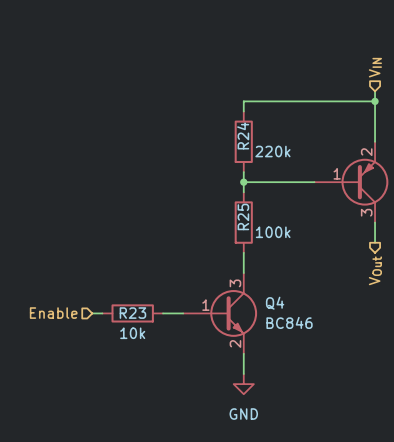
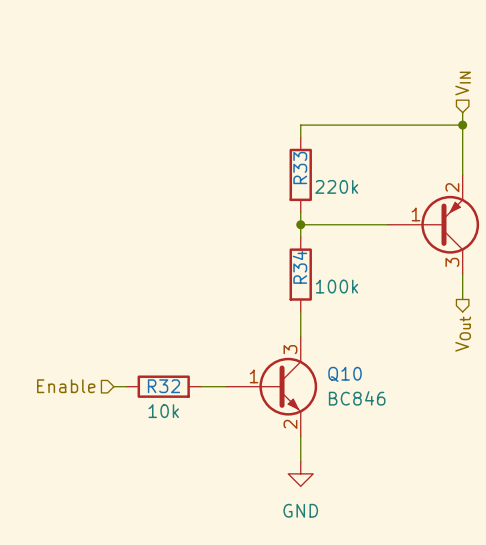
R24 name: R24 (243, 135) -> R33 (300, 168)
R25 name: R25 (243, 216) -> R34 (299, 267)
Q4 name: Q4 (275, 303) -> Q10 (345, 374)
R23 name: R23 (132, 313) -> R32 (164, 386)

